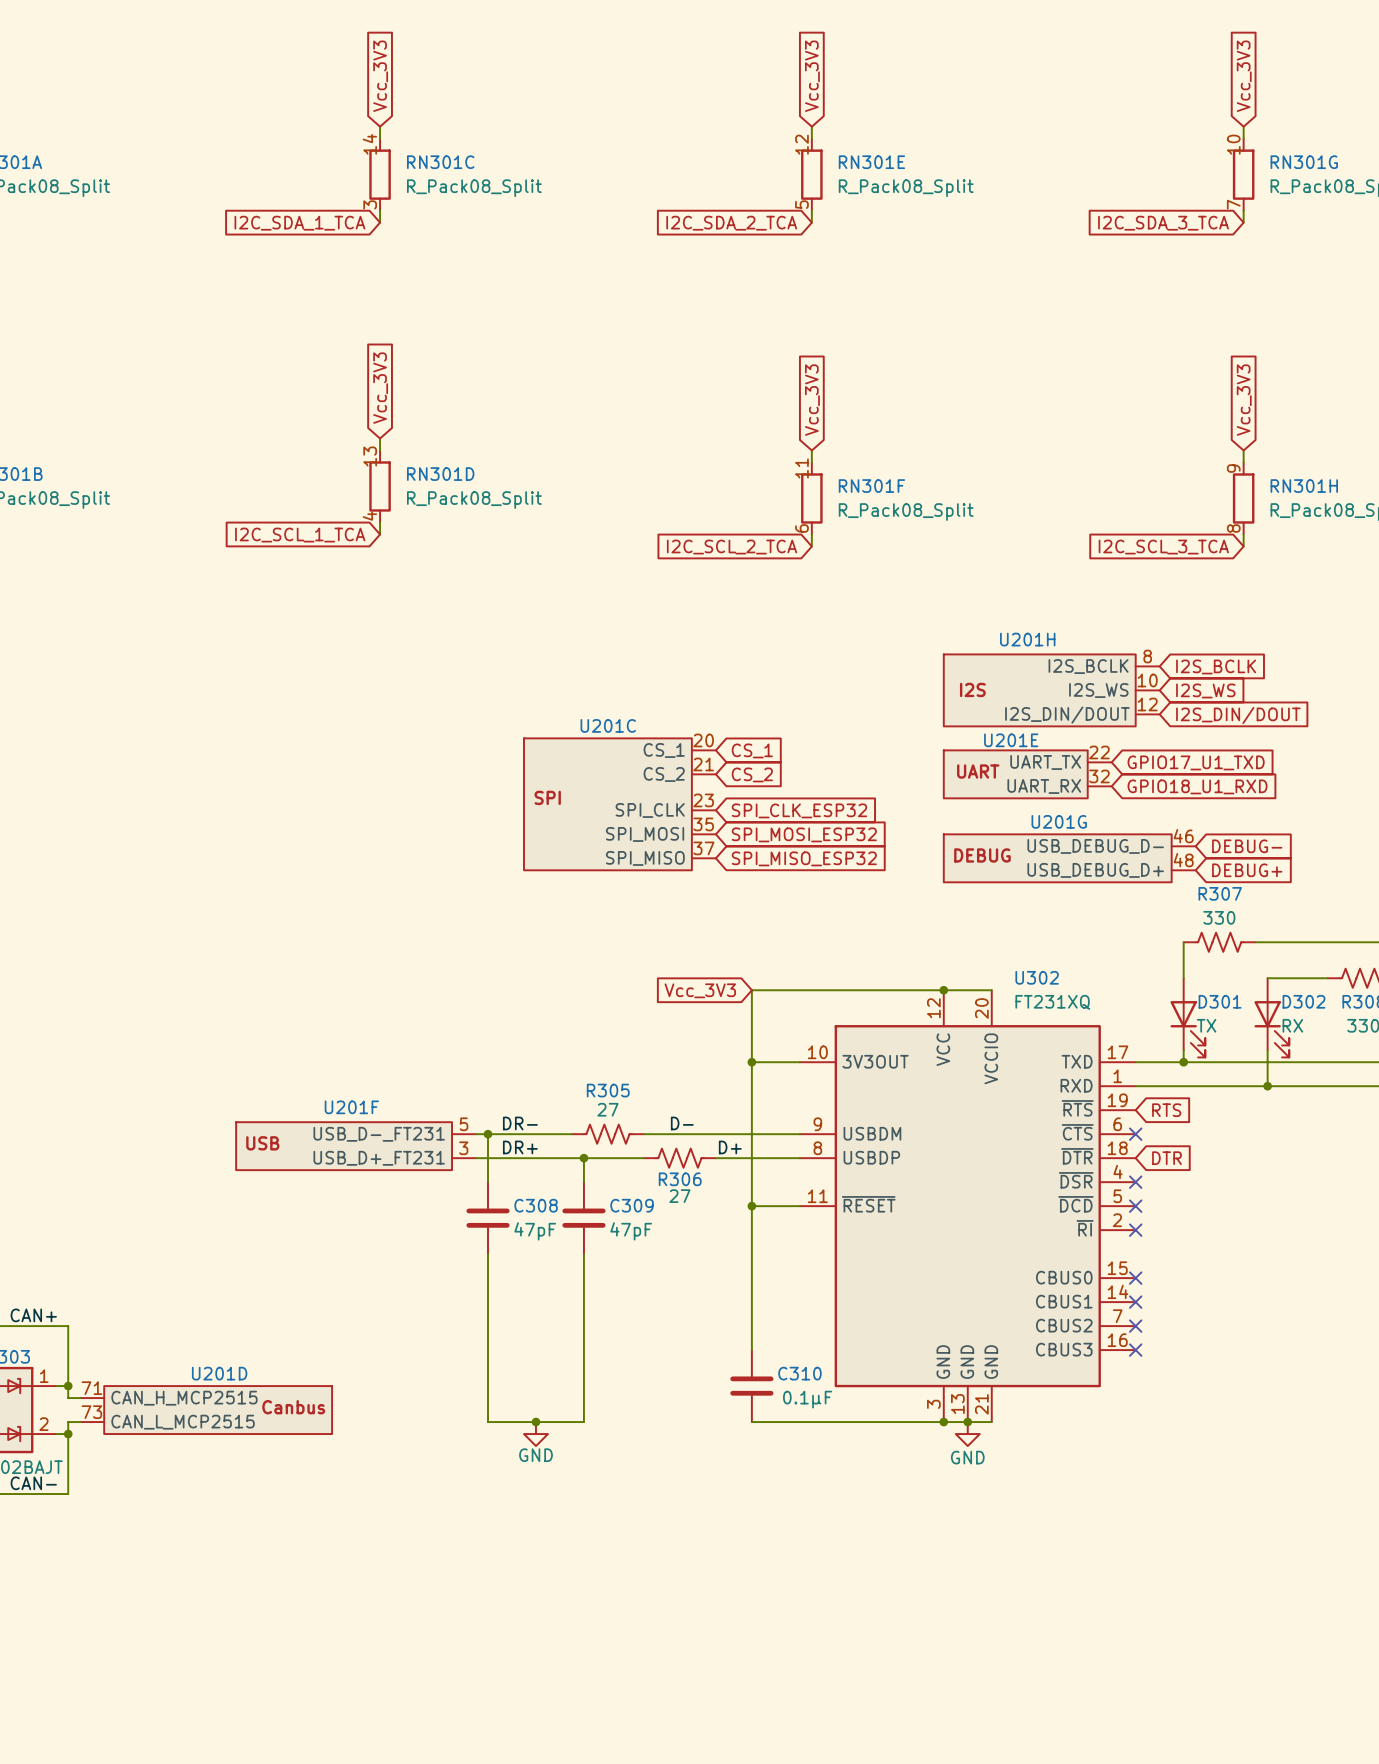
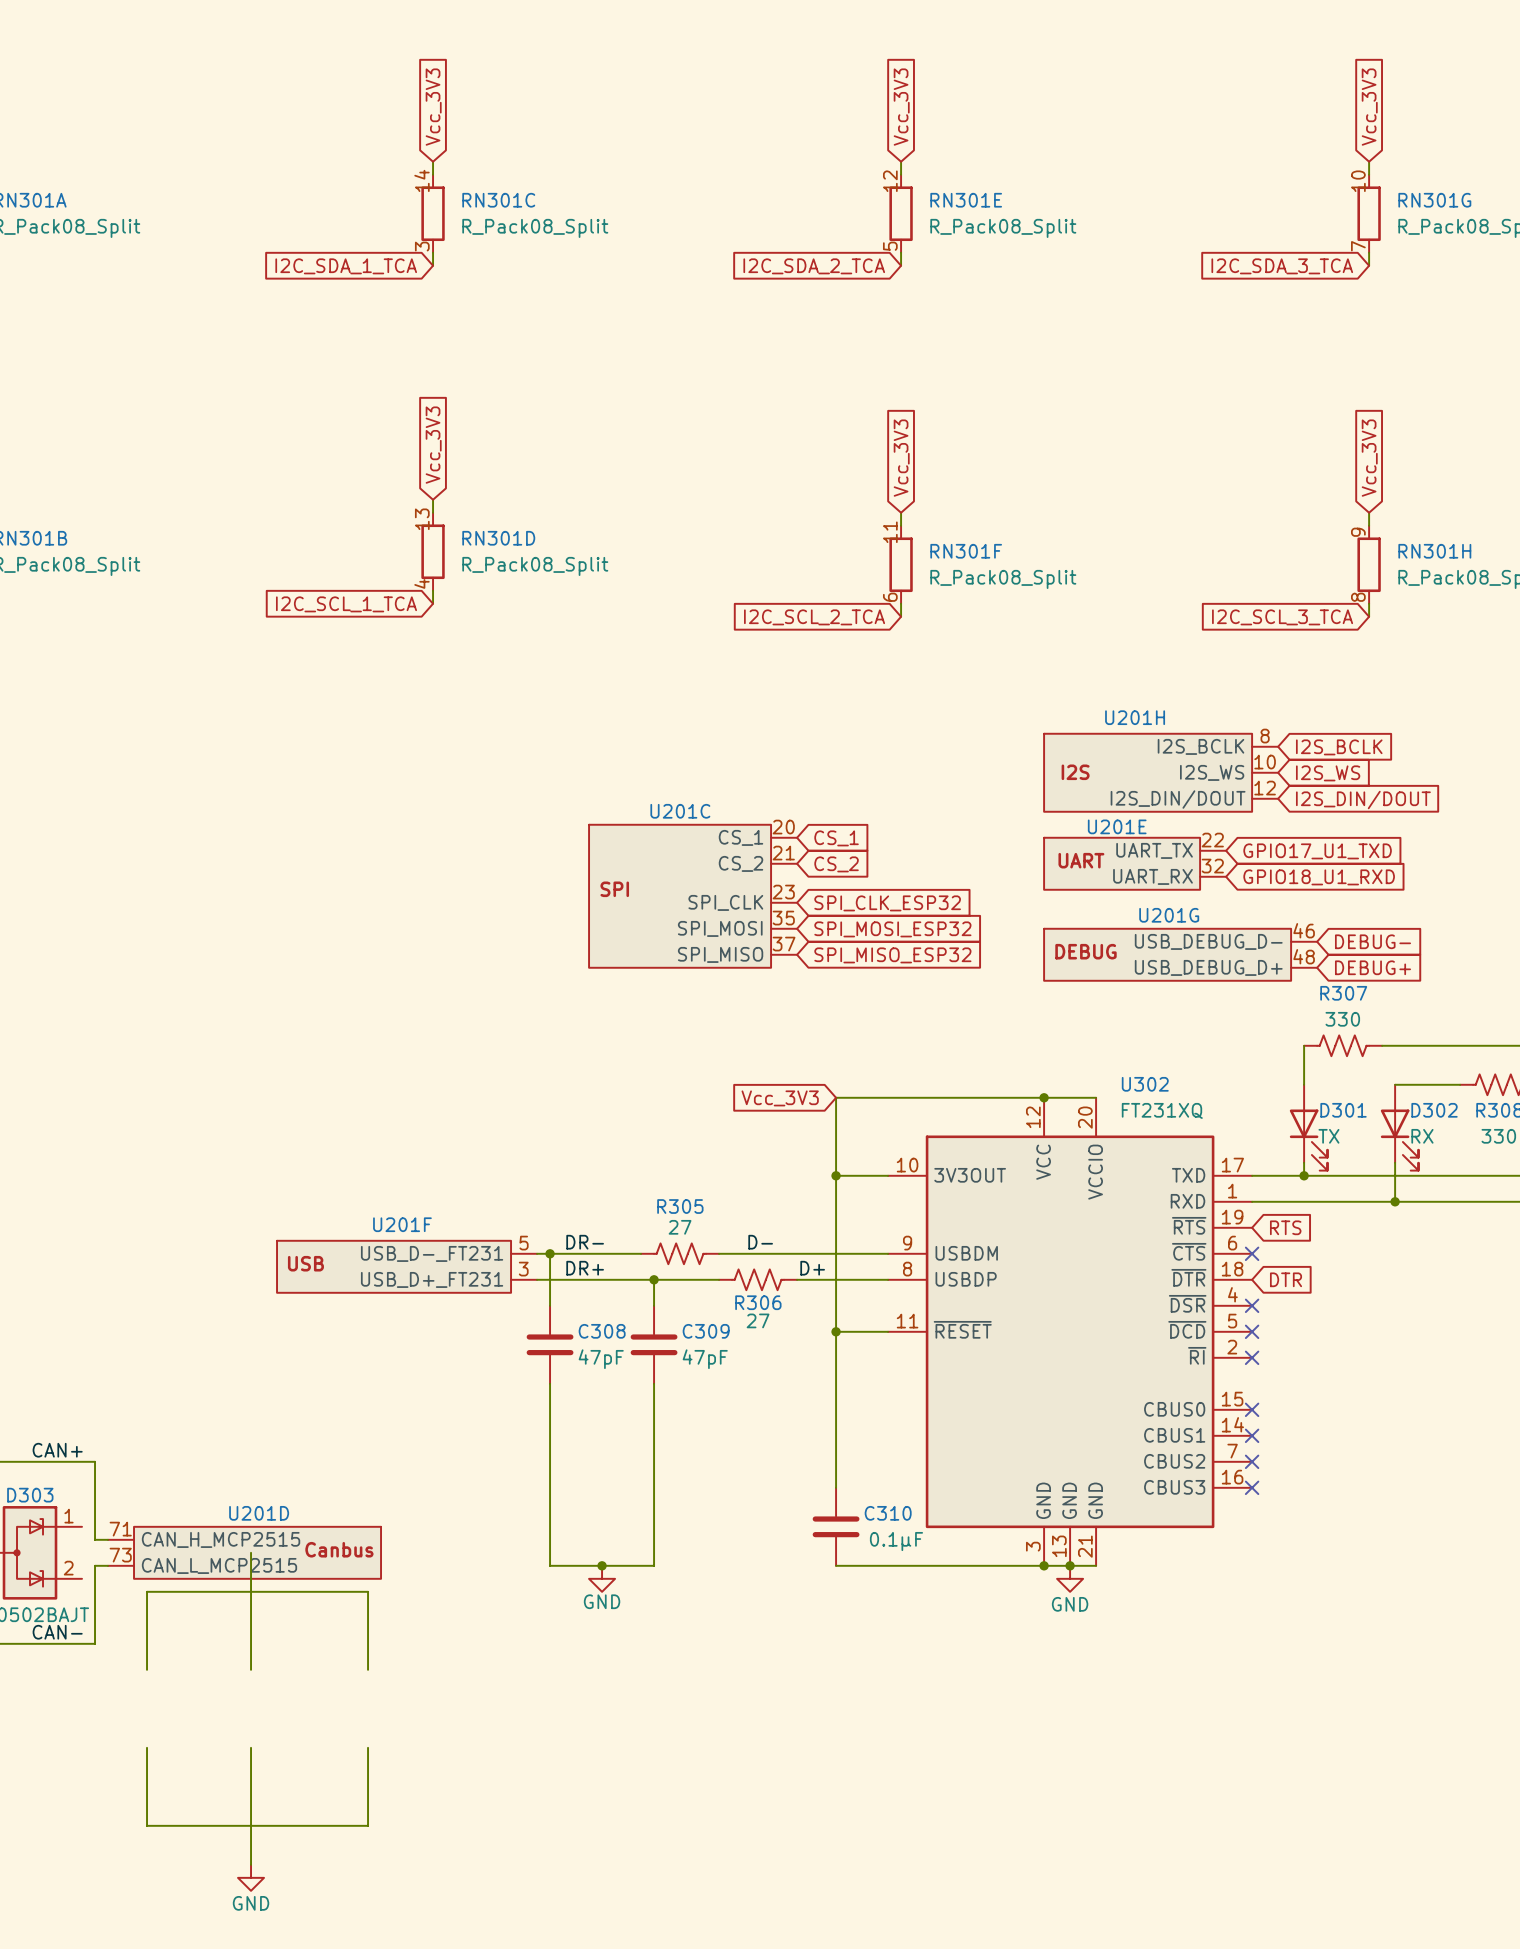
wire: (56, 1386) (68, 1386) -> none
junction: (68, 1386) -> none
wire: none -> (251, 1552) (251, 1669)
wire: (56, 1434) (68, 1434) -> none
junction: (68, 1434) -> none
wire: none -> (147, 1669) (147, 1591) (368, 1591) (368, 1669)
wire: none -> (147, 1747) (147, 1825) (368, 1825) (368, 1747)
wire: none -> (251, 1747) (251, 1864)
power symbol: none -> GND (251, 1877)

